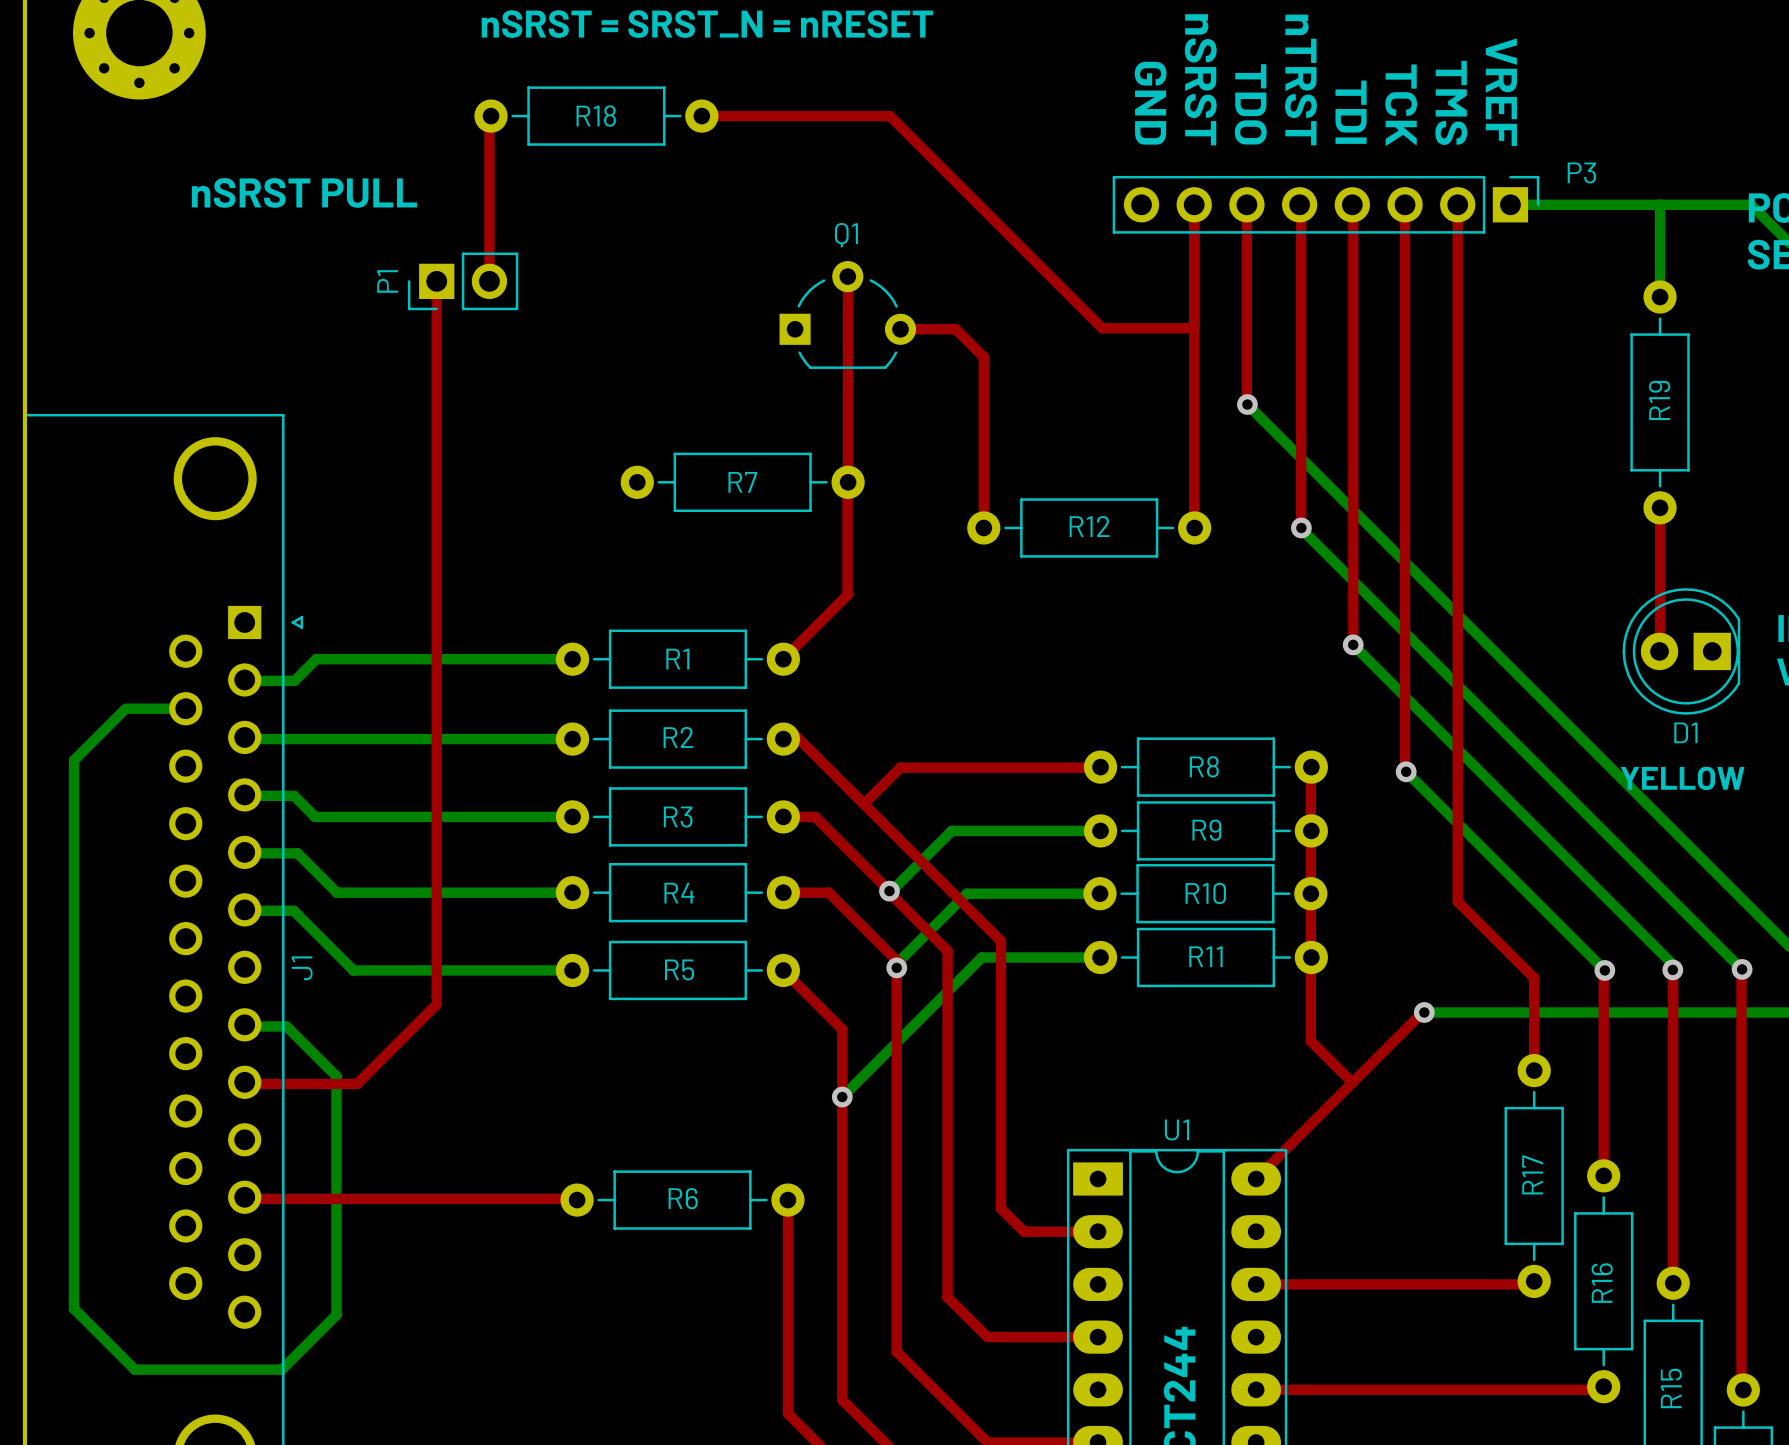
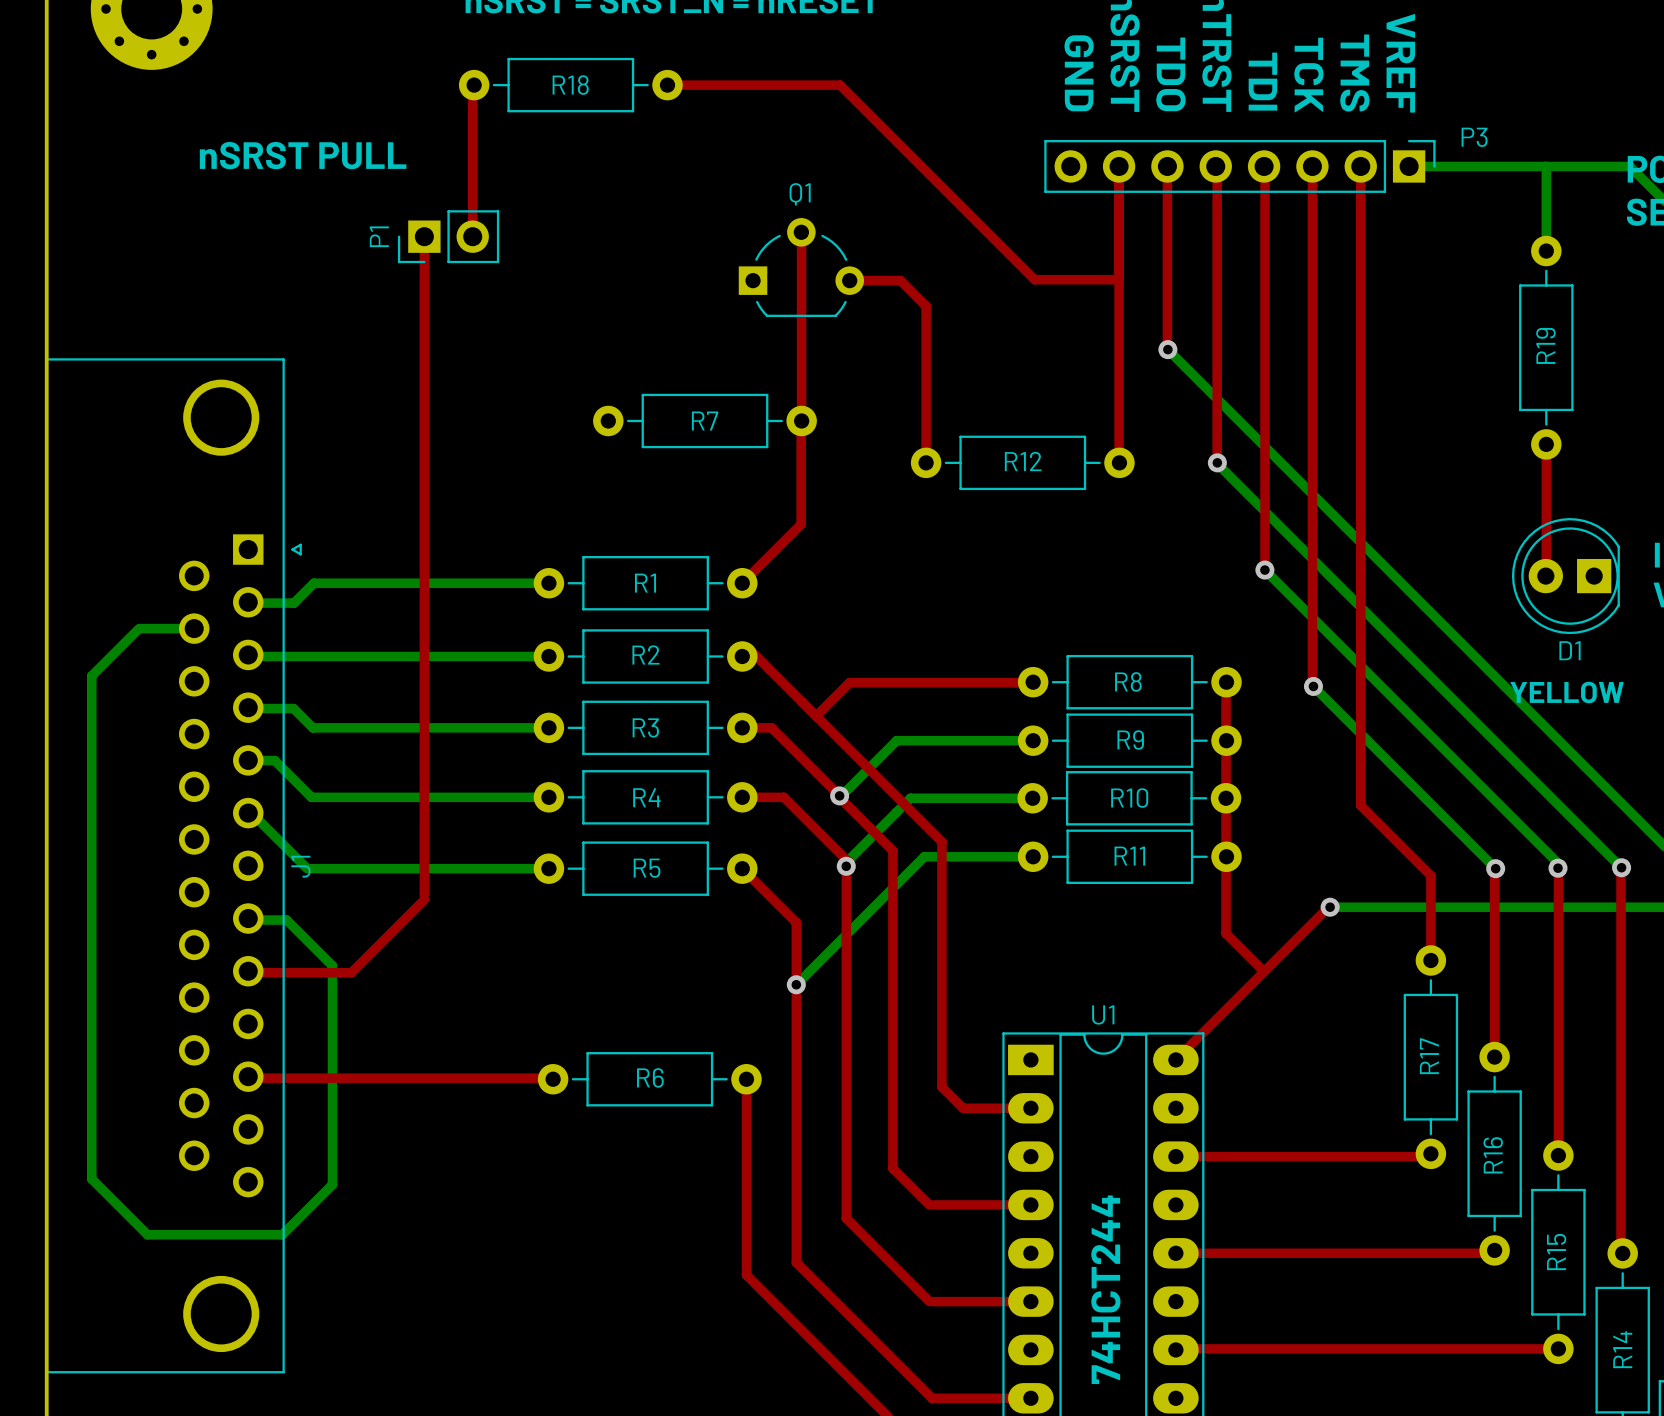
bottom track: (248, 853) (297, 853) (336, 892) -> (251, 760) (274, 760) (311, 797) (332, 797)
bottom track: (248, 910) (293, 910) (353, 970) -> (251, 813) (307, 868) (348, 868)

